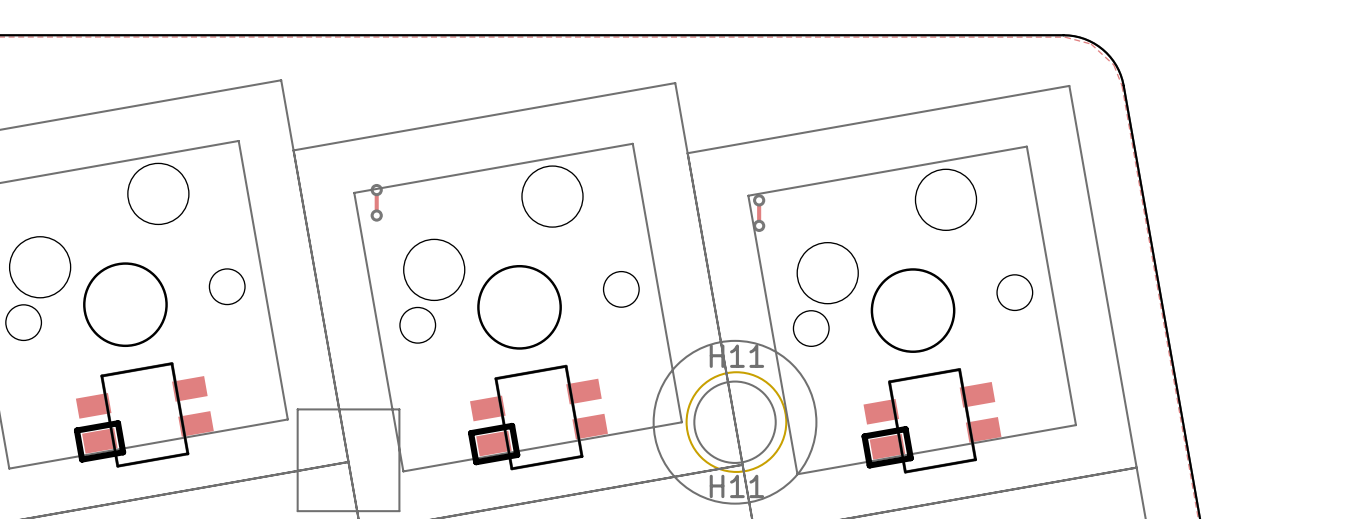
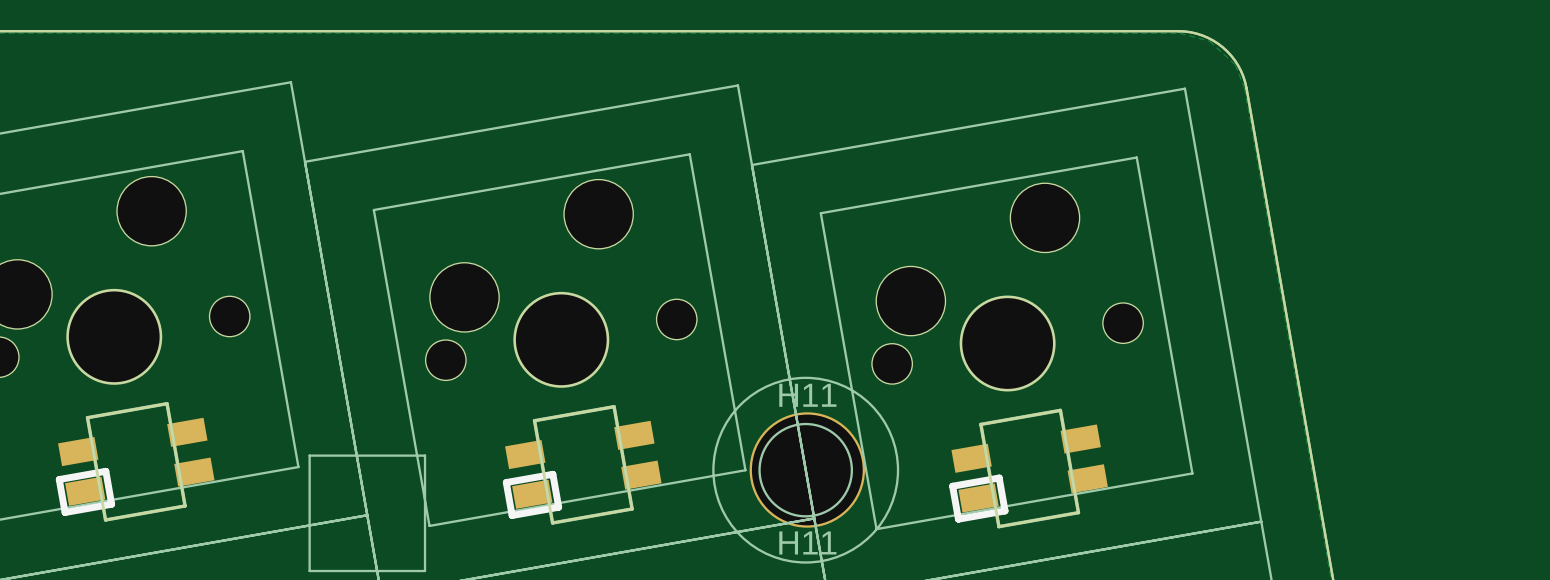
track: (376, 190) (376, 215) -> none
via: (376, 190) -> none
track: (759, 200) (759, 225) -> none
via: (759, 200) -> none
via: (376, 215) -> none
via: (759, 225) -> none

